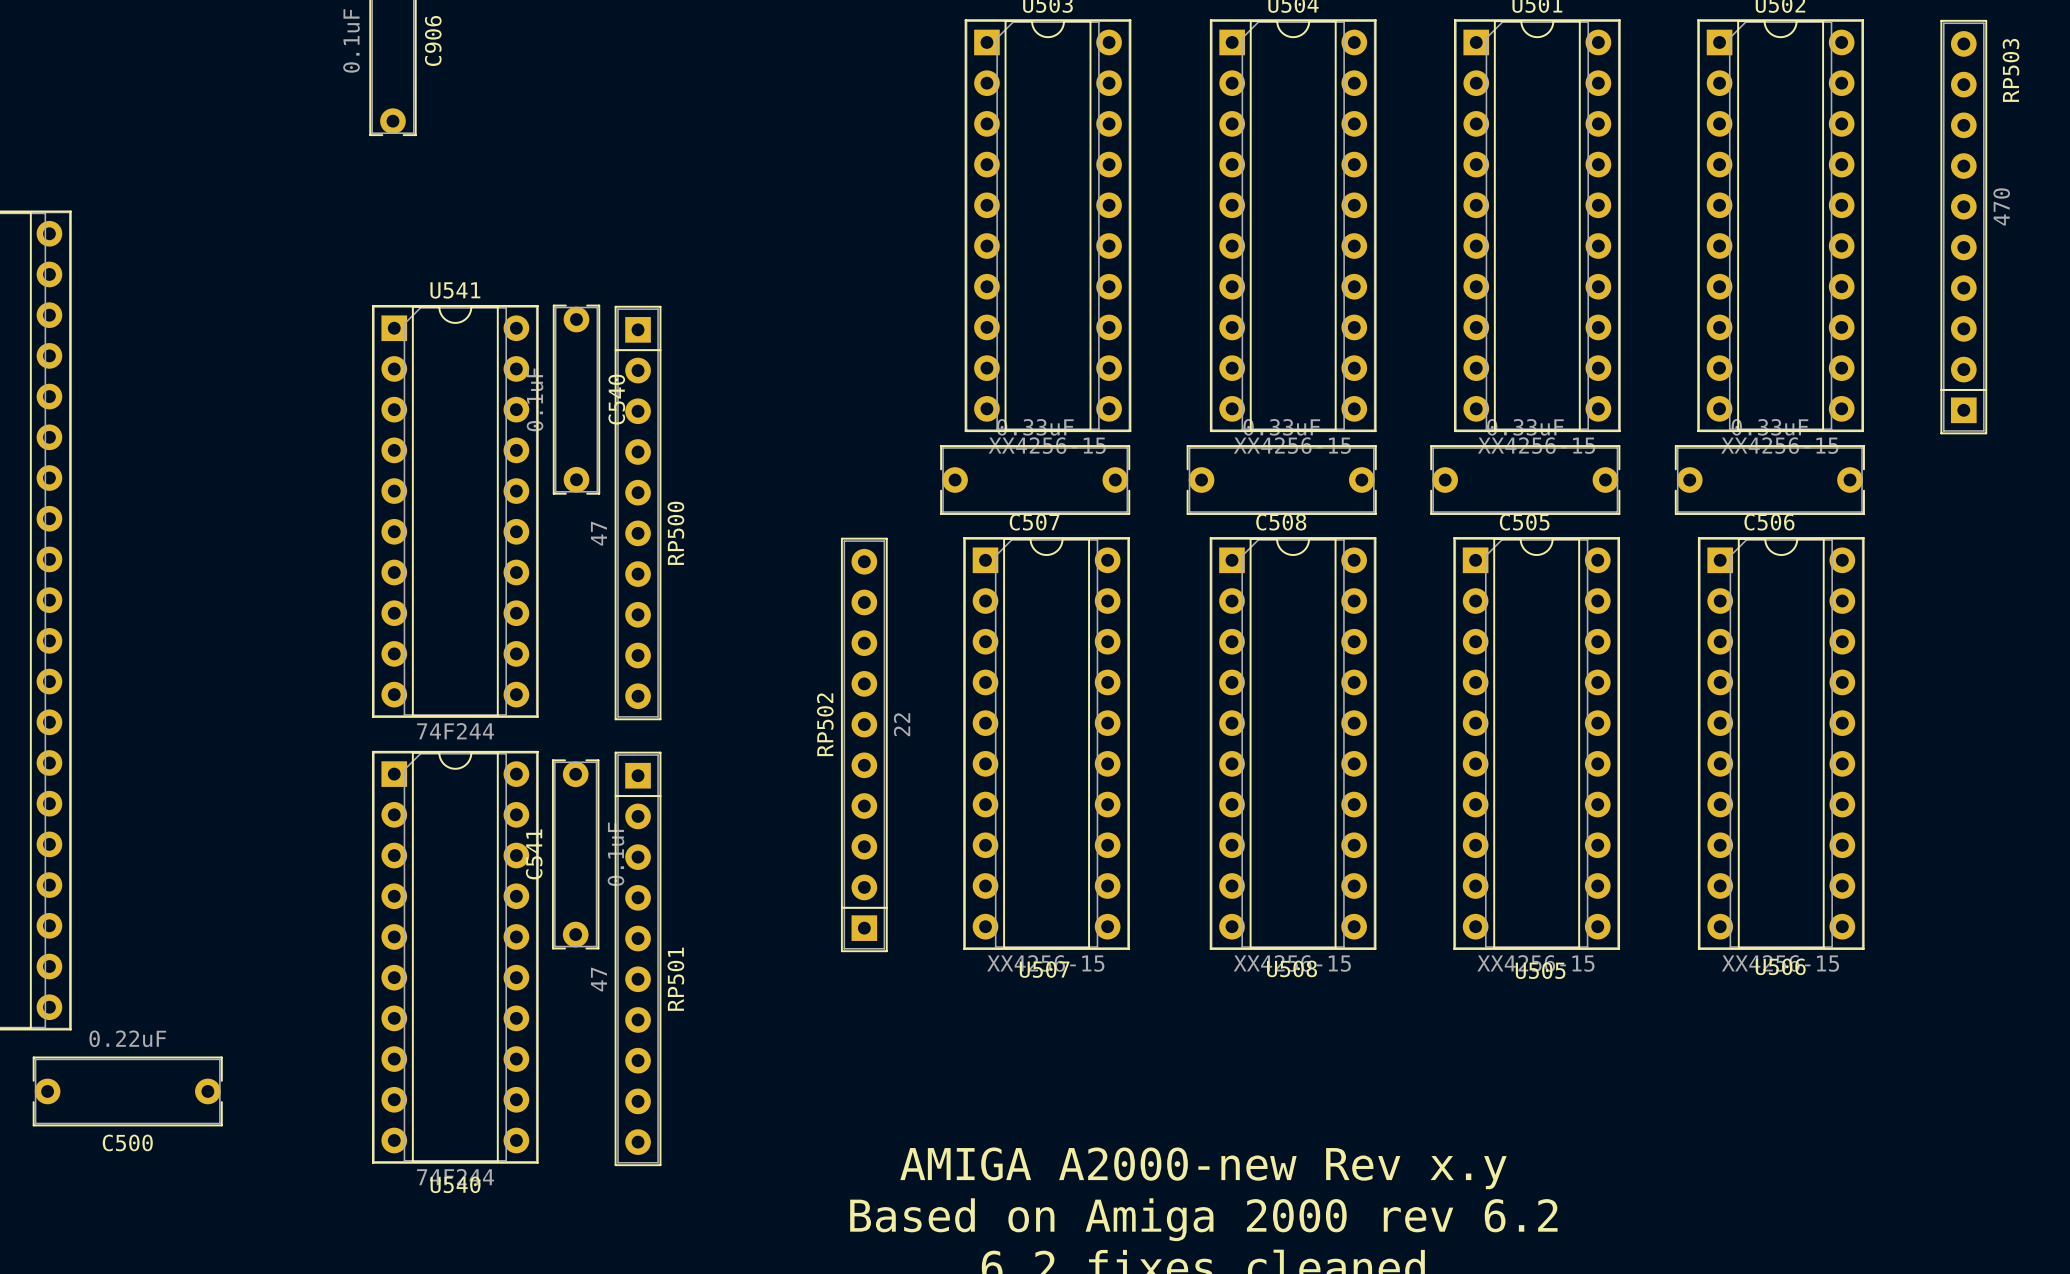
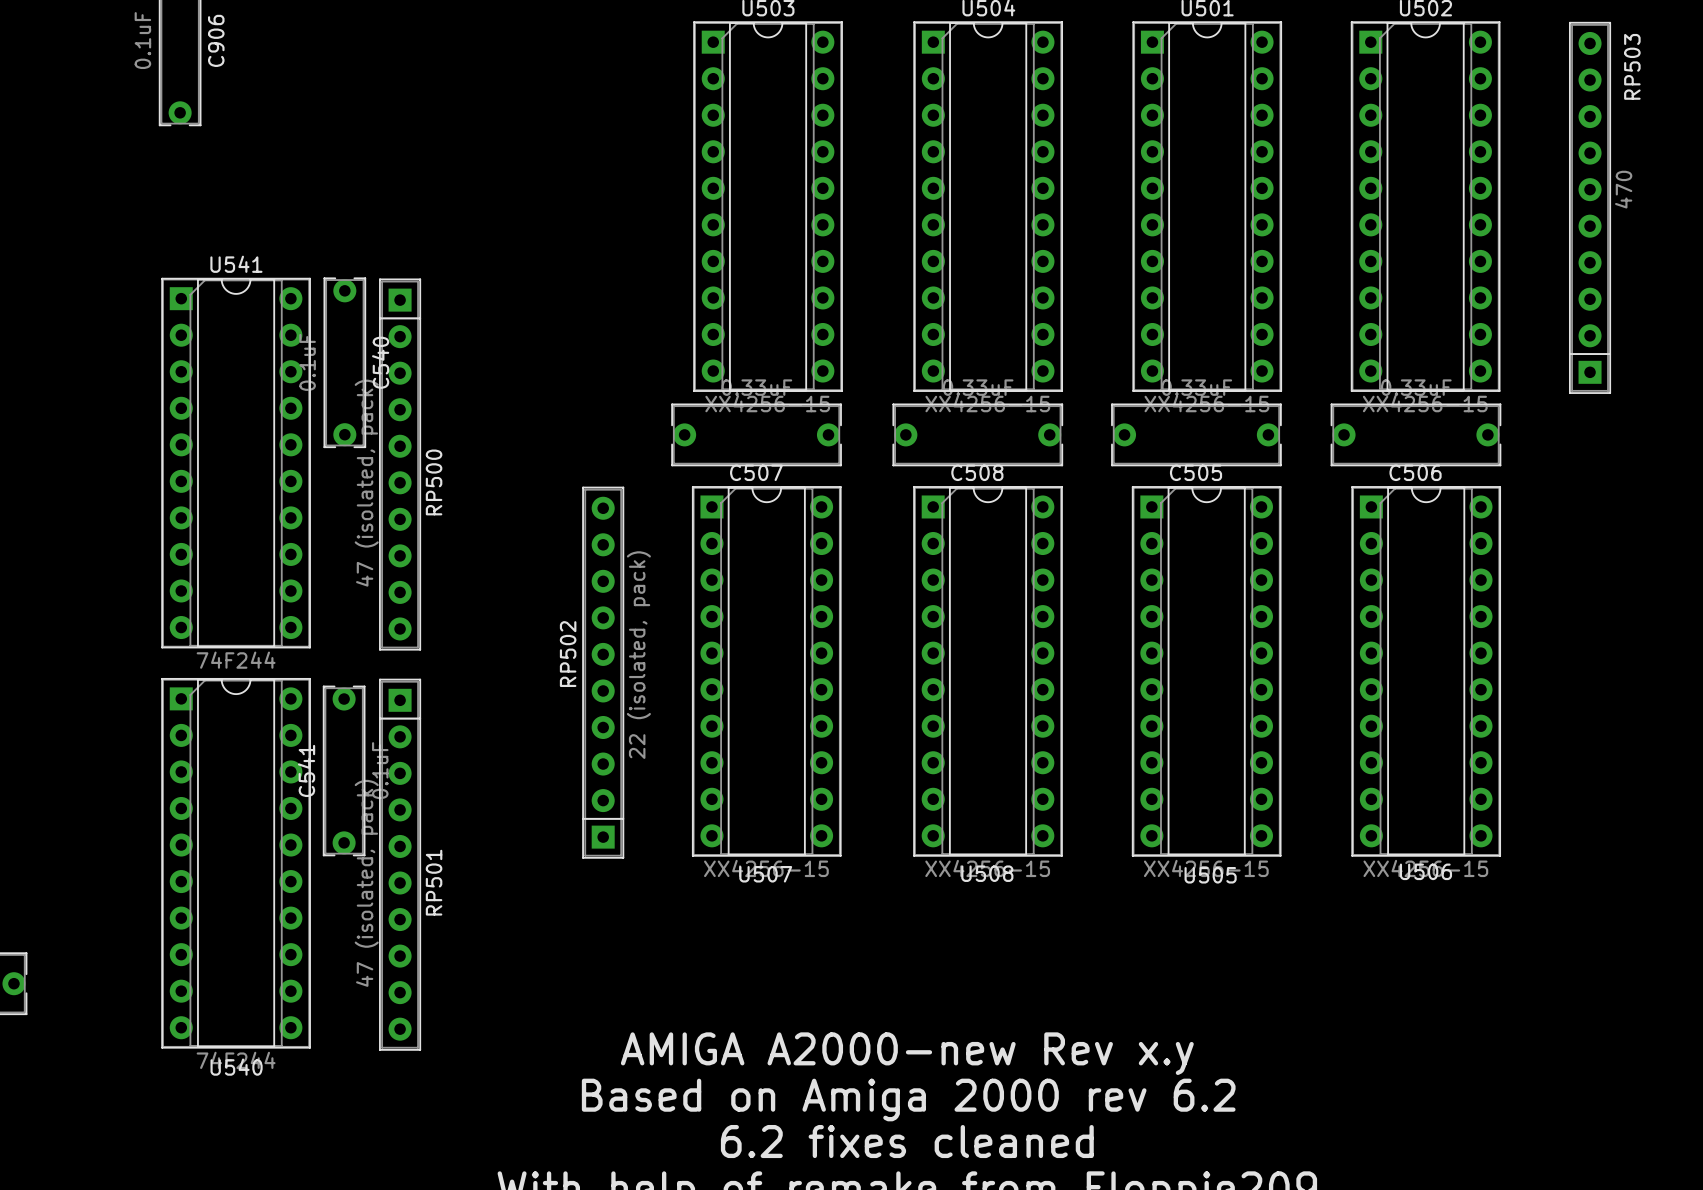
RP500 value: 47 (598, 533) -> 47 (isolated, pack) (366, 483)
RP502 value: 22 (902, 724) -> 22 (isolated, pack) (638, 655)
RP501 value: 47 (598, 979) -> 47 (isolated, pack) (366, 883)

